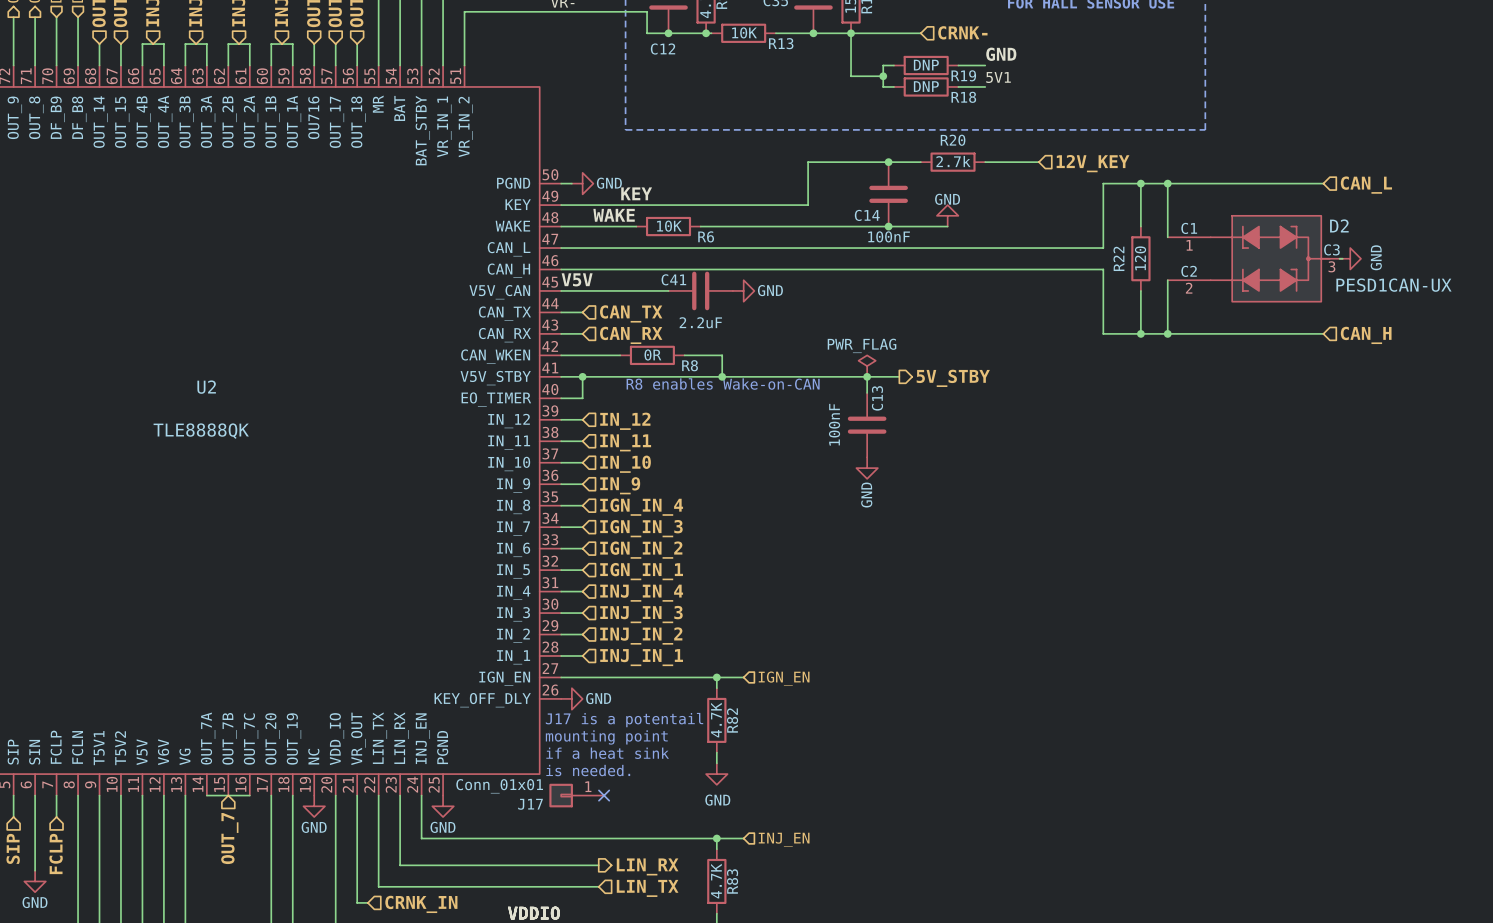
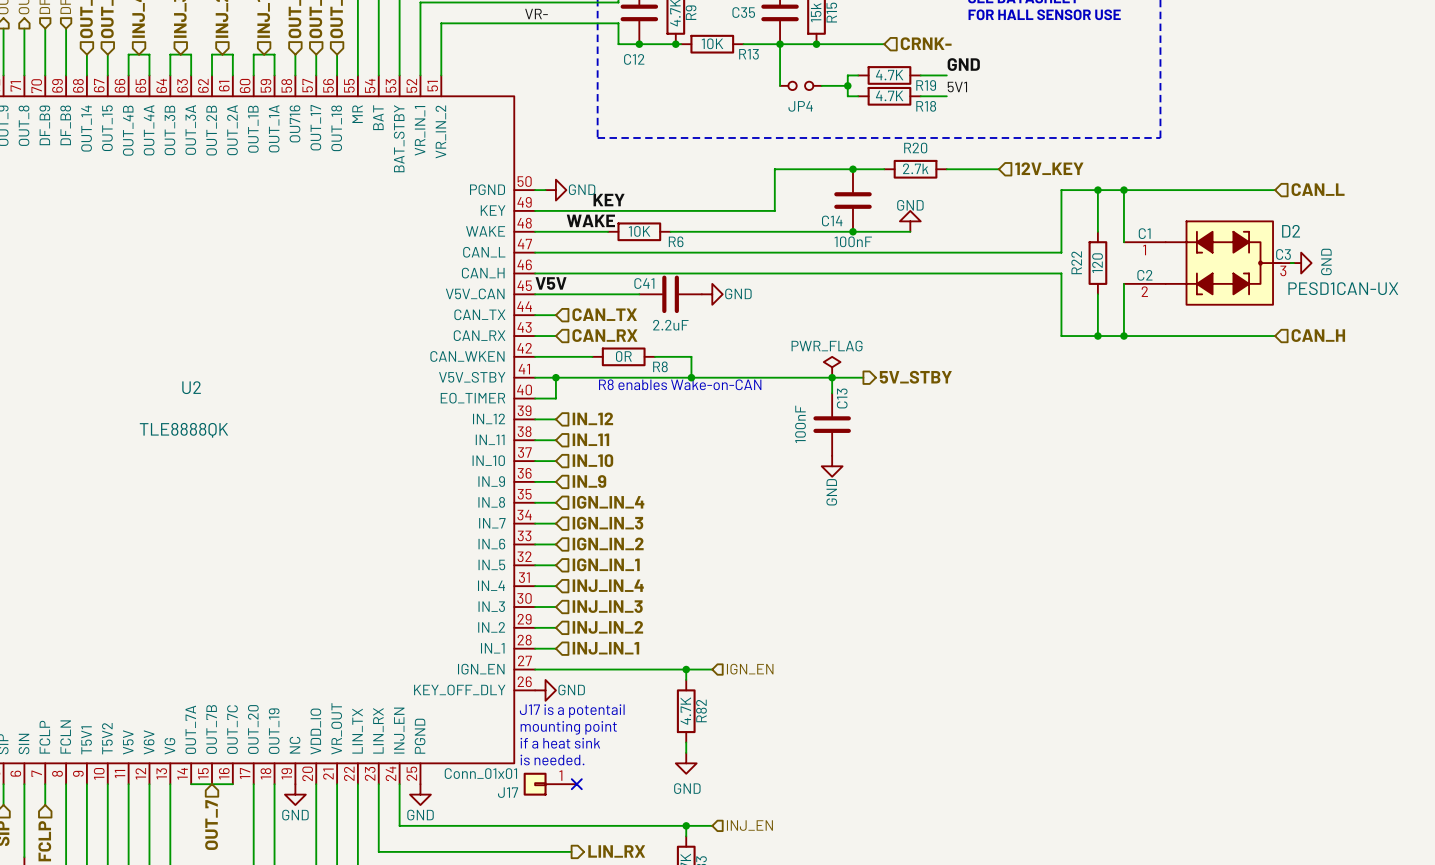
wire: none -> (780, 44) (780, 85)
wire: (851, 33) (851, 76) (856, 76) -> none
R19 value: DNP (926, 65) -> 4.7K (889, 75)
JP4: none -> (800, 85)
R18 value: DNP (926, 86) -> 4.7K (889, 95)

